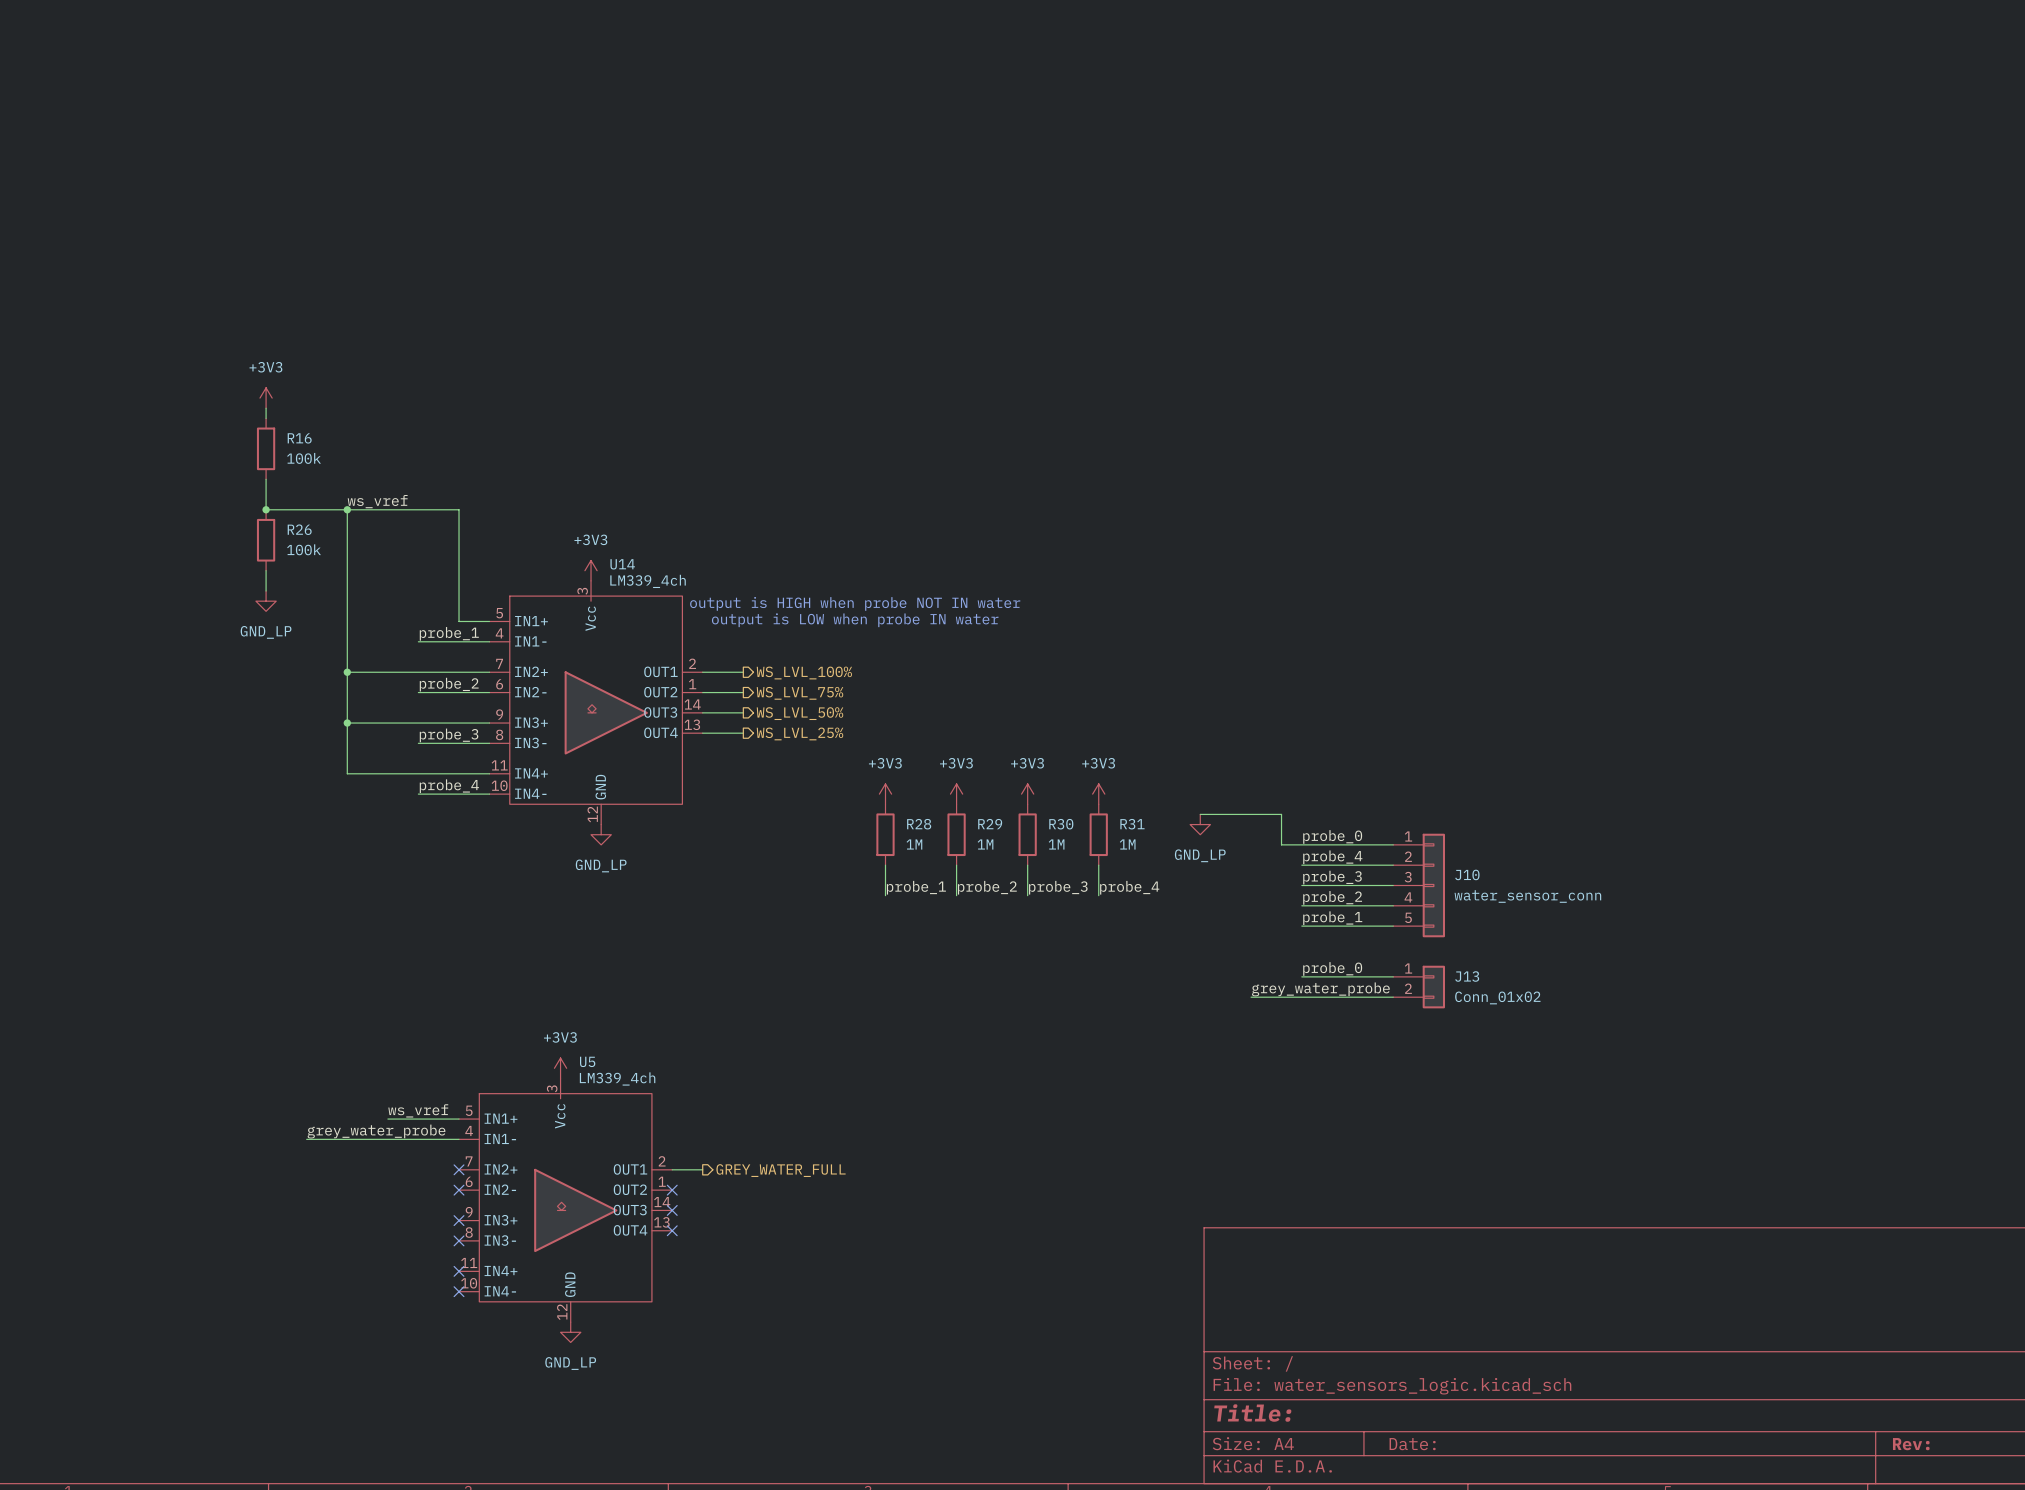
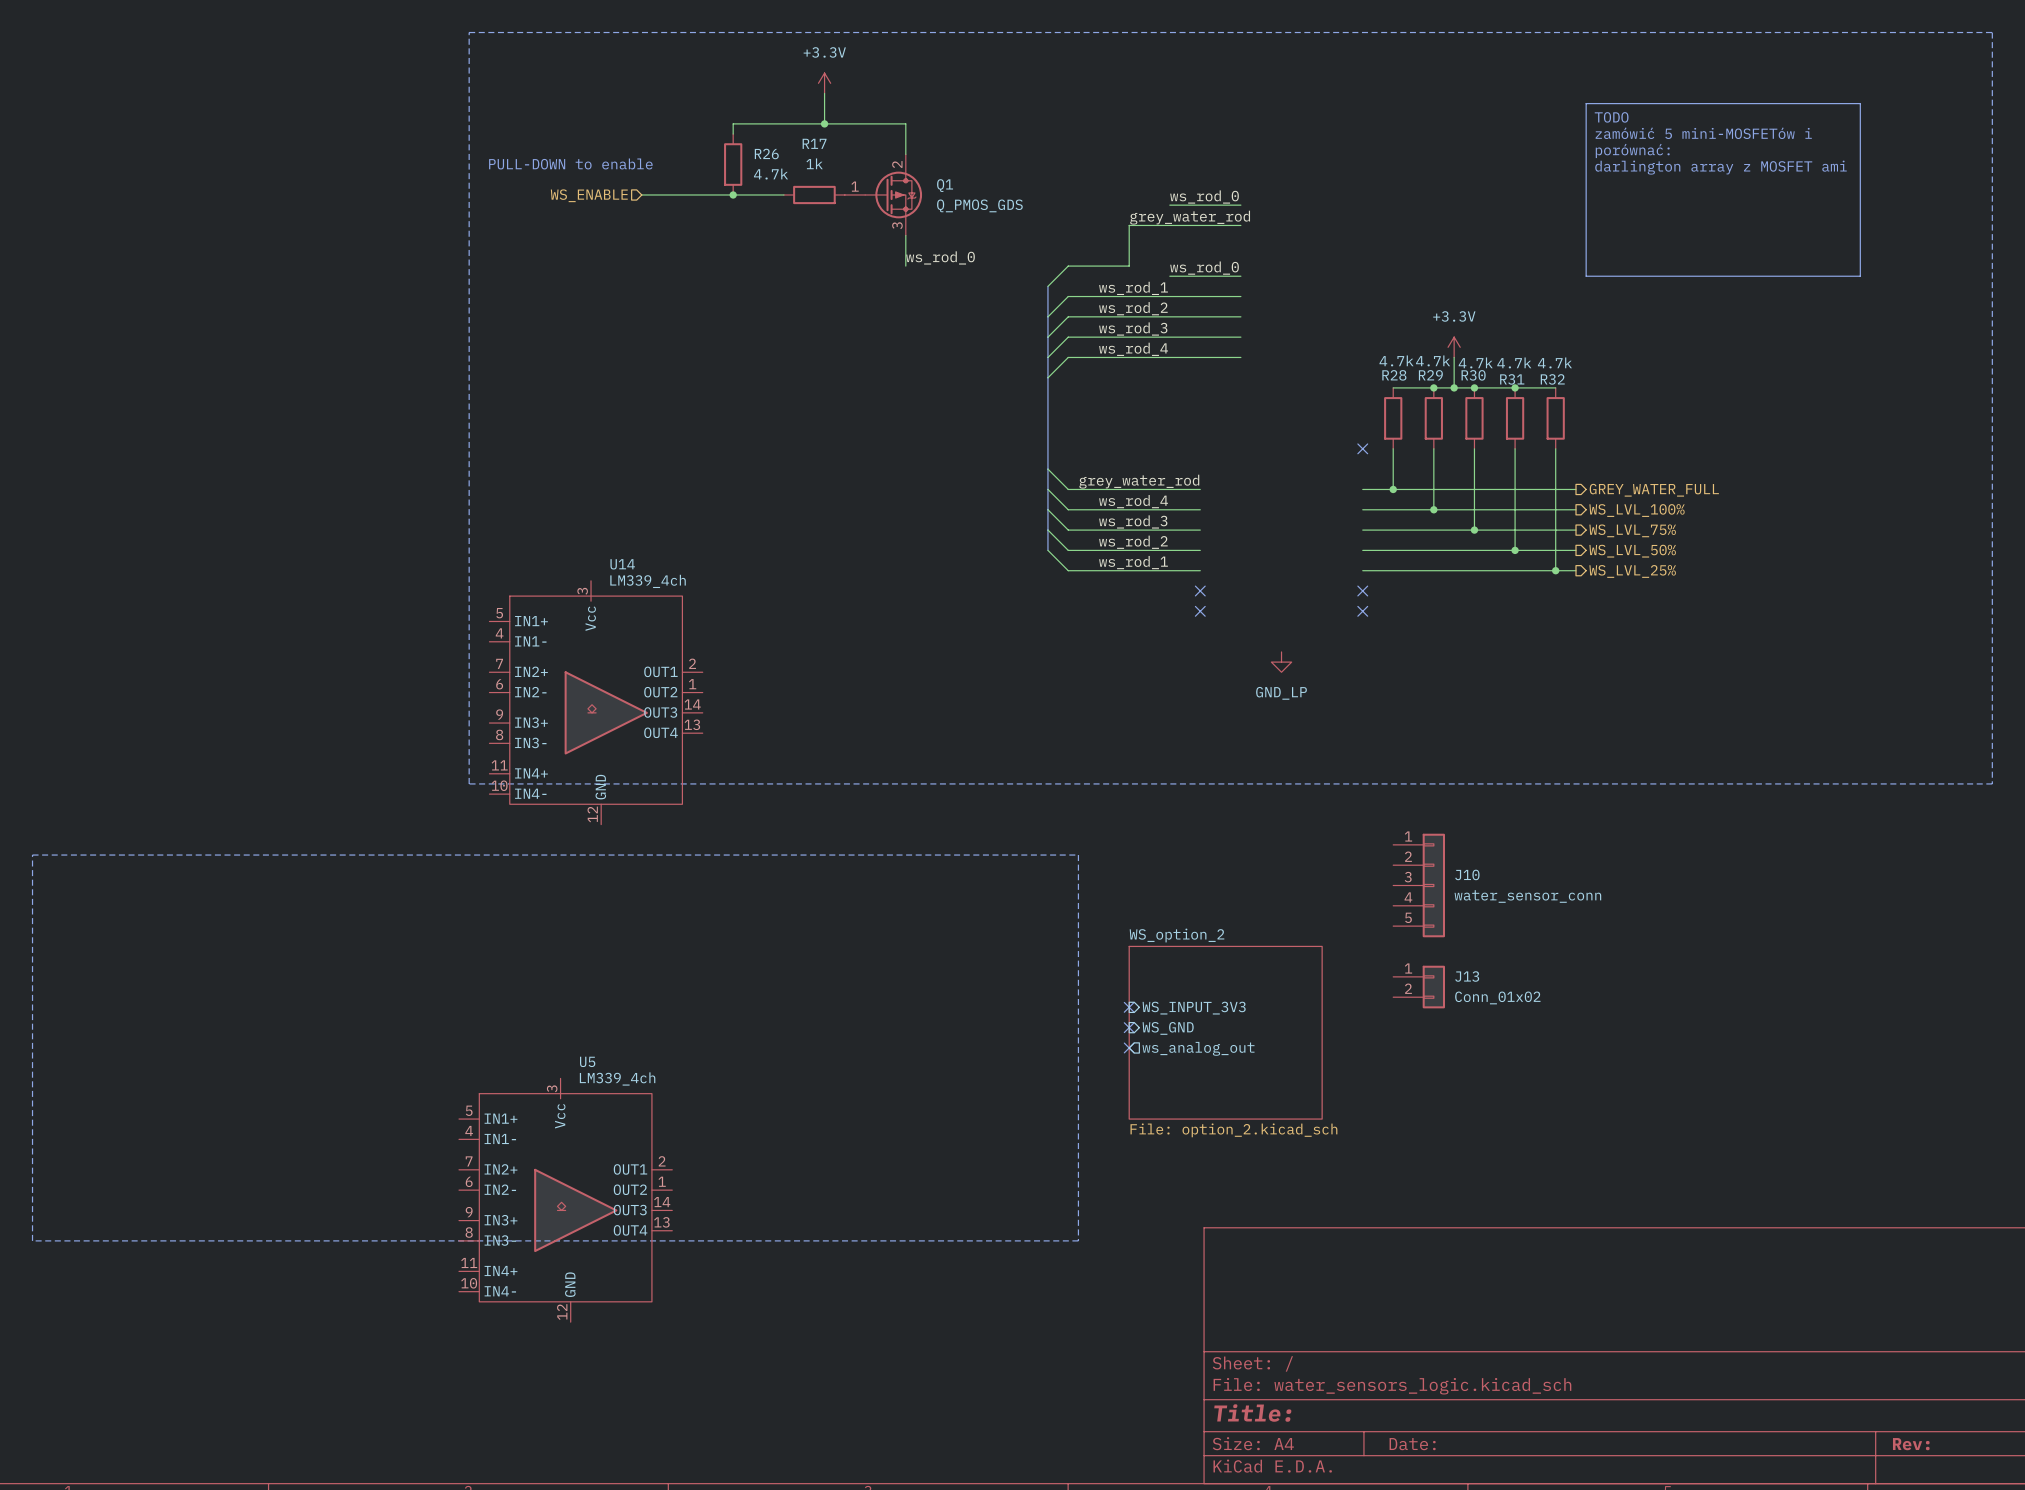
line: none -> (469, 32) (1992, 32) (1992, 783) (469, 783) (469, 32)
power symbol: none -> +3.3V (824, 83)
wire: none -> (824, 93) (824, 123)
line: none -> (1586, 103) (1860, 103) (1860, 276) (1586, 276) (1586, 103)
text: none -> TODO (1611, 117)
junction: none -> (824, 123)
text: none -> zamówić 5 mini-MOSFETów i (1703, 133)
wire: none -> (733, 134) (733, 123) (905, 123) (905, 154)
text: none -> porównać: (1632, 150)
text: none -> PULL-DOWN to enable (570, 163)
text: none -> darlington array z MOSFET ami (1721, 167)
wire: none -> (641, 194) (783, 194)
junction: none -> (733, 194)
R17: none -> 1k (814, 194)
Q1: none -> Q_PMOS_GDS (883, 194)
hierarchical label: none -> WS_ENABLE (589, 195)
label: none -> ws_rod_0 (1204, 197)
wire: none -> (1169, 205) (1240, 205)
label: none -> grey_water_rod (1190, 217)
wire: none -> (1240, 225) (1129, 225) (1129, 266) (1068, 266) (1047, 286)
wire: none -> (905, 235) (905, 266)
label: none -> ws_rod_0 (940, 257)
label: none -> ws_rod_0 (1204, 268)
wire: none -> (1169, 276) (1240, 276)
bus: none -> (1047, 286) (1047, 550)
label: none -> ws_rod_1 (1133, 288)
wire: none -> (1240, 296) (1068, 296) (1047, 316)
label: none -> ws_rod_2 (1133, 308)
wire: none -> (1240, 316) (1068, 316) (1047, 337)
label: none -> ws_rod_3 (1133, 329)
wire: none -> (1240, 337) (1068, 337) (1047, 357)
power symbol: none -> +3.3V (1454, 347)
label: none -> ws_rod_4 (1133, 349)
wire: none -> (1240, 357) (1068, 357) (1047, 377)
wire: none -> (1454, 357) (1454, 387)
wire: none -> (1393, 387) (1555, 387)
junction: none -> (1433, 387)
junction: none -> (1454, 387)
junction: none -> (1474, 387)
junction: none -> (1515, 387)
power symbol: +3V3 (266, 398) -> none
wire: (266, 408) (266, 418) -> none
R32: none -> 4.7k (1555, 418)
R16: 100k (266, 448) -> none
no-connect mark: none -> (1362, 448)
wire: none -> (1393, 448) (1393, 489)
wire: none -> (1433, 448) (1433, 509)
wire: none -> (1474, 448) (1474, 530)
wire: none -> (1515, 448) (1515, 550)
wire: none -> (1555, 448) (1555, 570)
wire: none -> (1047, 469) (1068, 489) (1200, 489)
wire: (266, 479) (266, 509) (459, 509) (459, 621) (489, 621) -> none
label: none -> grey_water_rod (1139, 481)
wire: none -> (1047, 489) (1068, 509) (1200, 509)
wire: none -> (1362, 489) (1576, 489)
junction: none -> (1393, 489)
hierarchical label: none -> GREY_WATER_FULL (1654, 490)
label: ws_vref (377, 501) -> none
label: none -> ws_rod_4 (1133, 501)
junction: (266, 509) -> none
wire: (347, 509) (347, 773) (489, 773) -> none
junction: (347, 509) -> none
wire: none -> (1047, 509) (1068, 530) (1200, 530)
wire: none -> (1362, 509) (1576, 509)
junction: none -> (1433, 509)
hierarchical label: none -> WS_LVL_100% (1637, 510)
label: none -> ws_rod_3 (1133, 521)
wire: none -> (1047, 530) (1068, 550) (1200, 550)
wire: none -> (1362, 530) (1576, 530)
junction: none -> (1474, 530)
hierarchical label: none -> WS_LVL_75% (1632, 530)
R26 position: (266, 540) -> (733, 164)
label: none -> ws_rod_2 (1133, 542)
R26 value: 100k (304, 549) -> 4.7k (771, 174)
wire: none -> (1047, 550) (1068, 570) (1200, 570)
wire: none -> (1362, 550) (1576, 550)
junction: none -> (1515, 550)
hierarchical label: none -> WS_LVL_50% (1632, 551)
label: none -> ws_rod_1 (1133, 562)
wire: (266, 570) (266, 591) -> none
power symbol: +3V3 (591, 570) -> none
wire: none -> (1362, 570) (1576, 570)
junction: none -> (1555, 570)
hierarchical label: none -> WS_LVL_25% (1632, 571)
no-connect mark: none -> (1200, 591)
no-connect mark: none -> (1362, 591)
power symbol: GND_LP (266, 601) -> none
text: output is HIGH when probe NOT IN water (855, 603) -> none
no-connect mark: none -> (1200, 611)
no-connect mark: none -> (1362, 611)
text: output is LOW when probe IN water (855, 620) -> none
label: probe_1 (449, 633) -> none
wire: (418, 641) (489, 641) -> none
wire: (347, 672) (489, 672) -> none
junction: (347, 672) -> none
wire: (702, 672) (743, 672) -> none
hierarchical label: WS_LVL_100% (804, 673) -> none
label: probe_2 (449, 684) -> none
wire: (418, 692) (489, 692) -> none
wire: (702, 692) (743, 692) -> none
hierarchical label: WS_LVL_75% (800, 693) -> none
wire: (702, 712) (743, 712) -> none
hierarchical label: WS_LVL_50% (800, 713) -> none
wire: (347, 723) (489, 723) -> none
junction: (347, 723) -> none
wire: (702, 733) (743, 733) -> none
hierarchical label: WS_LVL_25% (800, 733) -> none
label: probe_3 (449, 735) -> none
wire: (418, 743) (489, 743) -> none
label: probe_4 (449, 786) -> none
wire: (418, 794) (489, 794) -> none
power symbol: +3V3 (885, 794) -> none
power symbol: +3V3 (956, 794) -> none
power symbol: +3V3 (1027, 794) -> none
power symbol: +3V3 (1098, 794) -> none
wire: (1200, 814) (1281, 814) (1281, 844) (1393, 844) -> none
R28 name position: R28 (919, 824) -> R28 (1394, 375)
R29 name position: R29 (990, 824) -> R29 (1430, 375)
R30 name position: R30 (1061, 824) -> R30 (1473, 375)
R31 name position: R31 (1132, 824) -> R31 (1512, 379)
power symbol position: GND_LP (1200, 824) -> GND_LP (1281, 662)
power symbol: GND_LP (601, 834) -> none
R28 position: (885, 834) -> (1393, 418)
R29 position: (956, 834) -> (1433, 418)
R30 position: (1027, 834) -> (1474, 418)
R31 position: (1098, 834) -> (1515, 418)
label: probe_0 (1332, 836) -> none
R28 value: 1M (914, 844) -> 4.7k (1396, 360)
R29 value: 1M (985, 844) -> 4.7k (1433, 360)
R30 value: 1M (1056, 844) -> 4.7k (1475, 362)
R31 value: 1M (1127, 844) -> 4.7k (1514, 362)
line: none -> (32, 855) (1078, 855) (1078, 1240) (32, 1240) (32, 855)
label: probe_4 (1332, 857) -> none
wire: (885, 865) (885, 895) -> none
wire: (956, 865) (956, 895) -> none
wire: (1027, 865) (1027, 895) -> none
wire: (1098, 865) (1098, 895) -> none
wire: (1301, 865) (1393, 865) -> none
label: probe_3 (1332, 877) -> none
wire: (1301, 885) (1393, 885) -> none
label: probe_1 (916, 887) -> none
label: probe_2 (987, 887) -> none
label: probe_3 (1058, 887) -> none
label: probe_4 (1129, 887) -> none
label: probe_2 (1332, 897) -> none
wire: (1301, 905) (1393, 905) -> none
label: probe_1 (1332, 918) -> none
wire: (1301, 926) (1393, 926) -> none
label: probe_0 (1332, 968) -> none
wire: (1301, 976) (1393, 976) -> none
label: grey_water_probe (1320, 989) -> none
wire: (1251, 997) (1393, 997) -> none
no-connect mark: none -> (1129, 1007)
sheet pin: none -> WS_INPUT_3V3 (1194, 1008)
no-connect mark: none -> (1129, 1027)
sheet pin: none -> WS_GND (1168, 1028)
sheet WS_option_2: none -> File: option_2.kicad_sch (1225, 1032)
no-connect mark: none -> (1129, 1047)
sheet pin: none -> ws_analog_out (1198, 1048)
power symbol: +3V3 (560, 1068) -> none
label: ws_vref (418, 1110) -> none
wire: (387, 1119) (459, 1119) -> none
label: grey_water_probe (376, 1131) -> none
wire: (306, 1139) (459, 1139) -> none
no-connect mark: (459, 1169) -> none
wire: (672, 1169) (702, 1169) -> none
hierarchical label: GREY_WATER_FULL (781, 1170) -> none
no-connect mark: (459, 1190) -> none
no-connect mark: (672, 1190) -> none
no-connect mark: (672, 1210) -> none
no-connect mark: (459, 1220) -> none
no-connect mark: (672, 1230) -> none
no-connect mark: (459, 1240) -> none
no-connect mark: (459, 1271) -> none
no-connect mark: (459, 1291) -> none
power symbol: GND_LP (570, 1332) -> none

